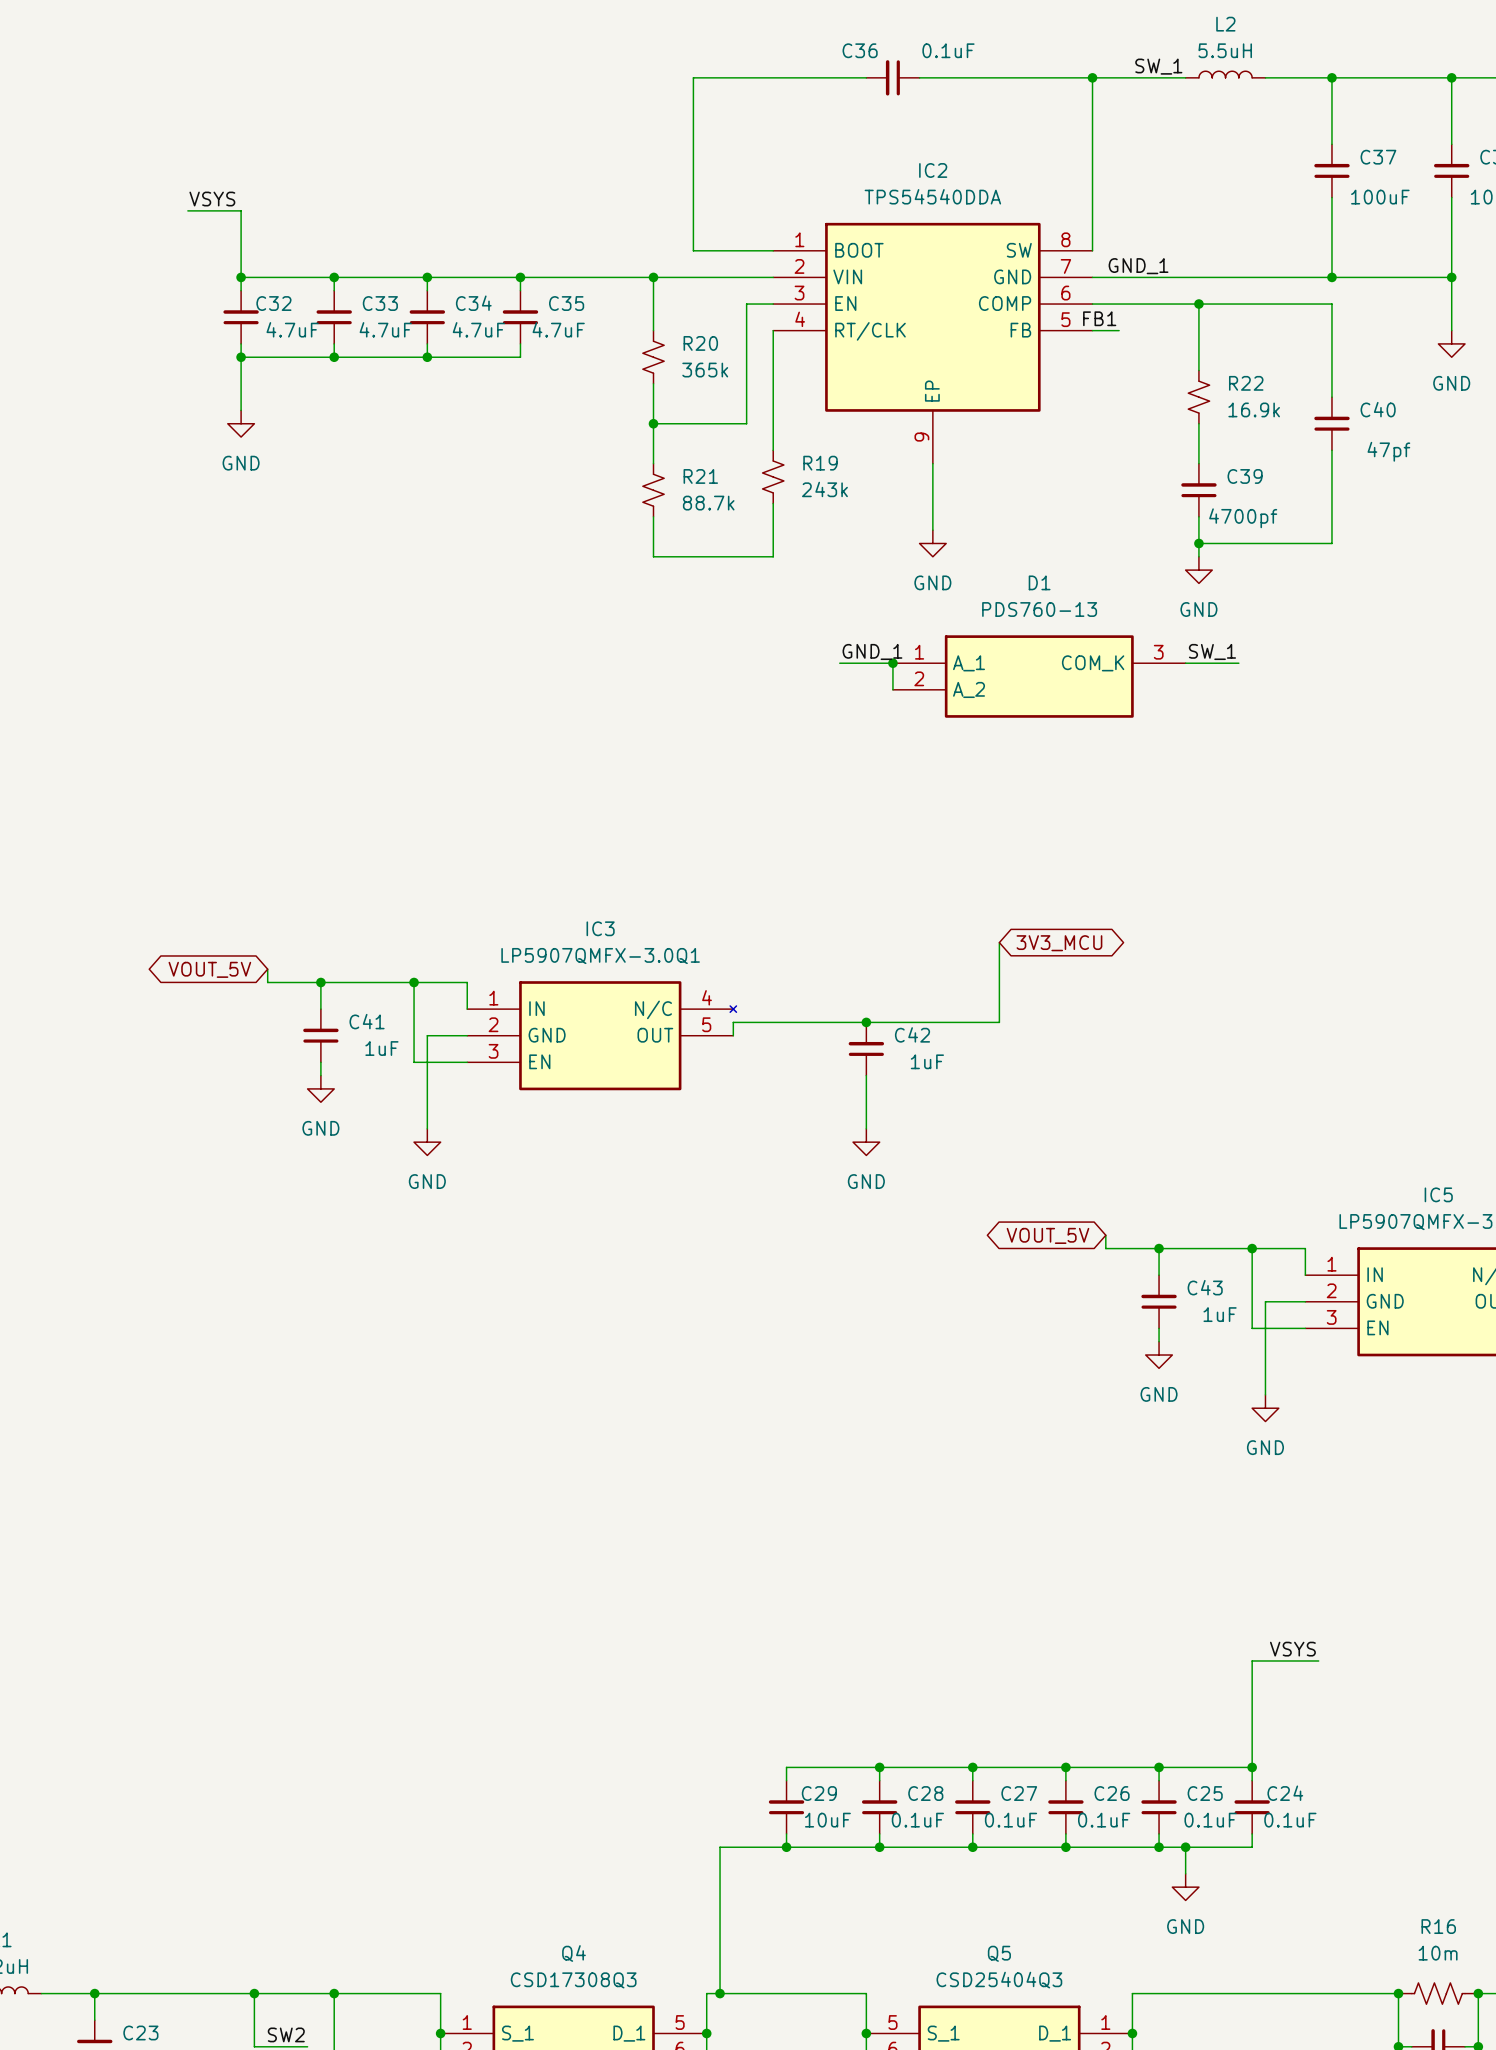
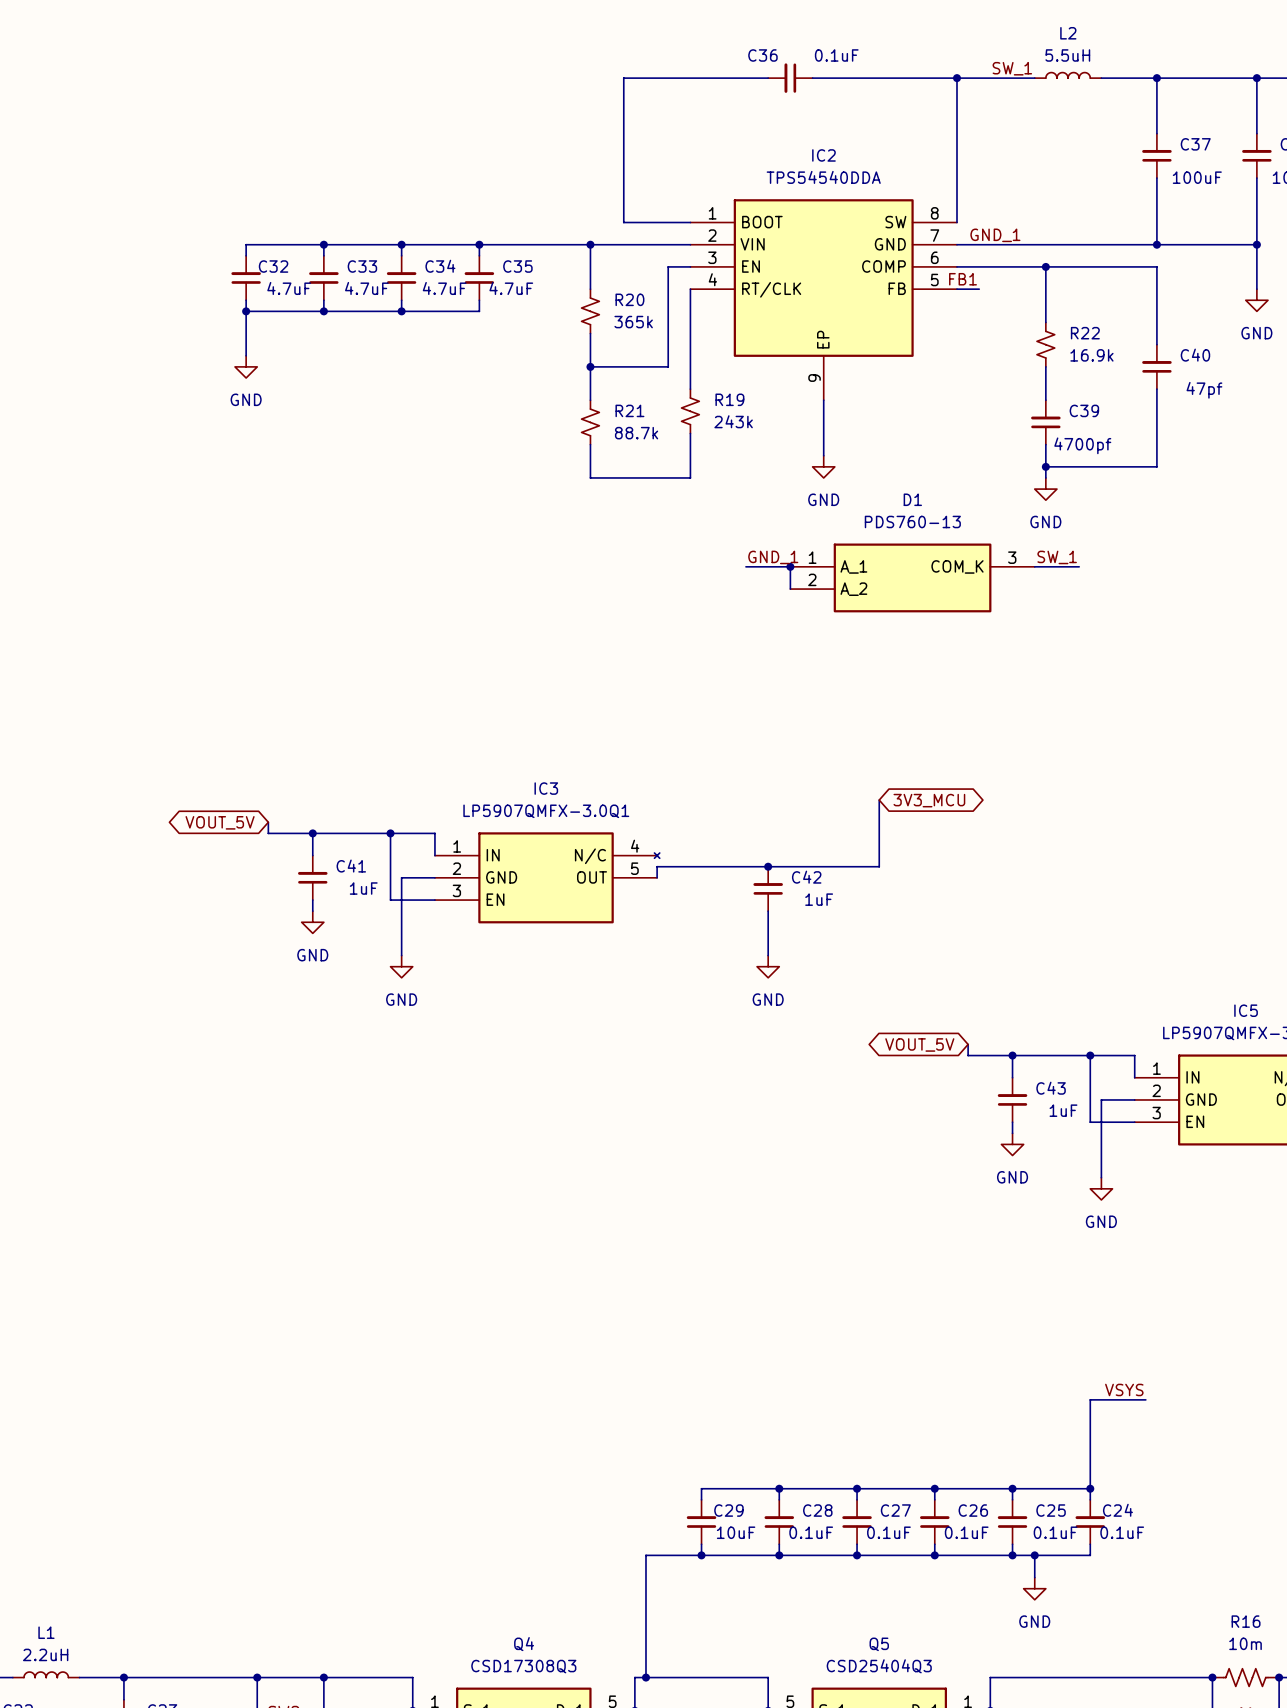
label: VSYS (212, 199) -> none
wire: (187, 210) (241, 210) (241, 277) -> none
junction: (241, 277) -> none

